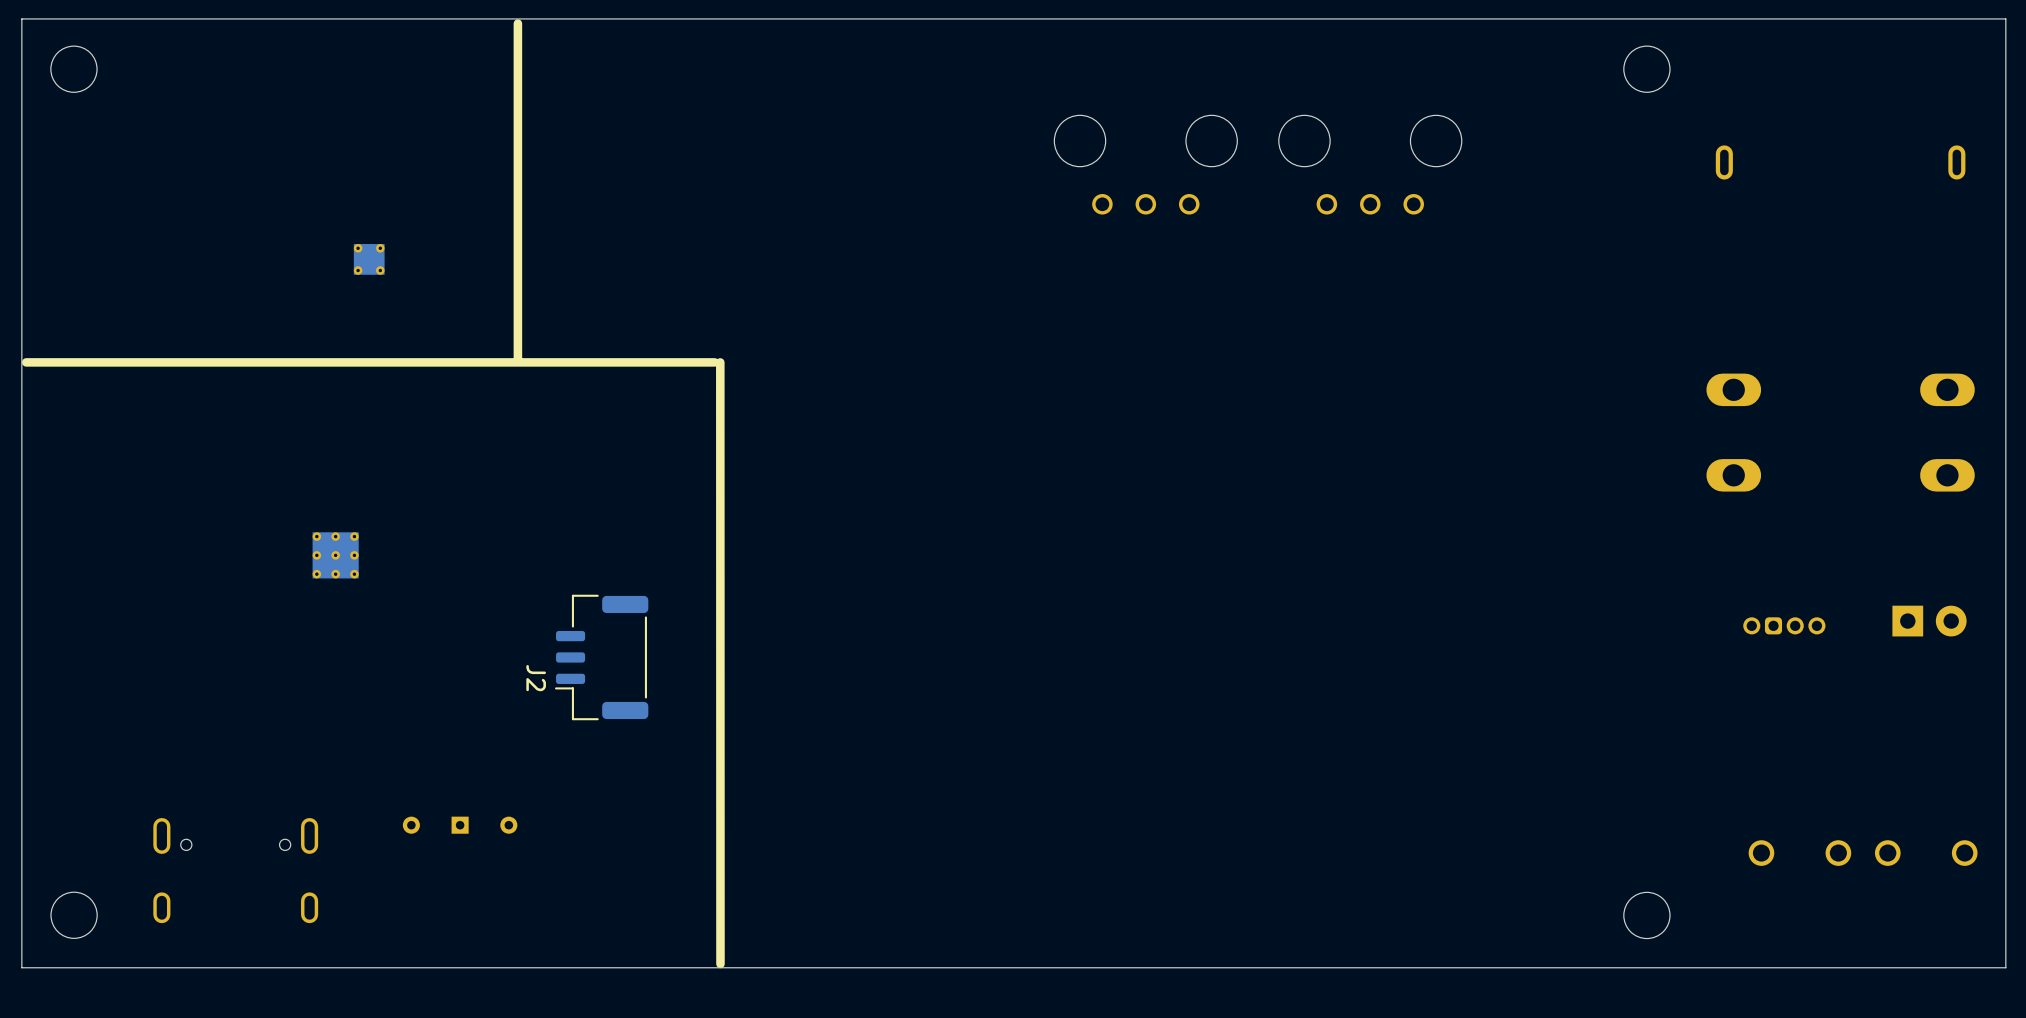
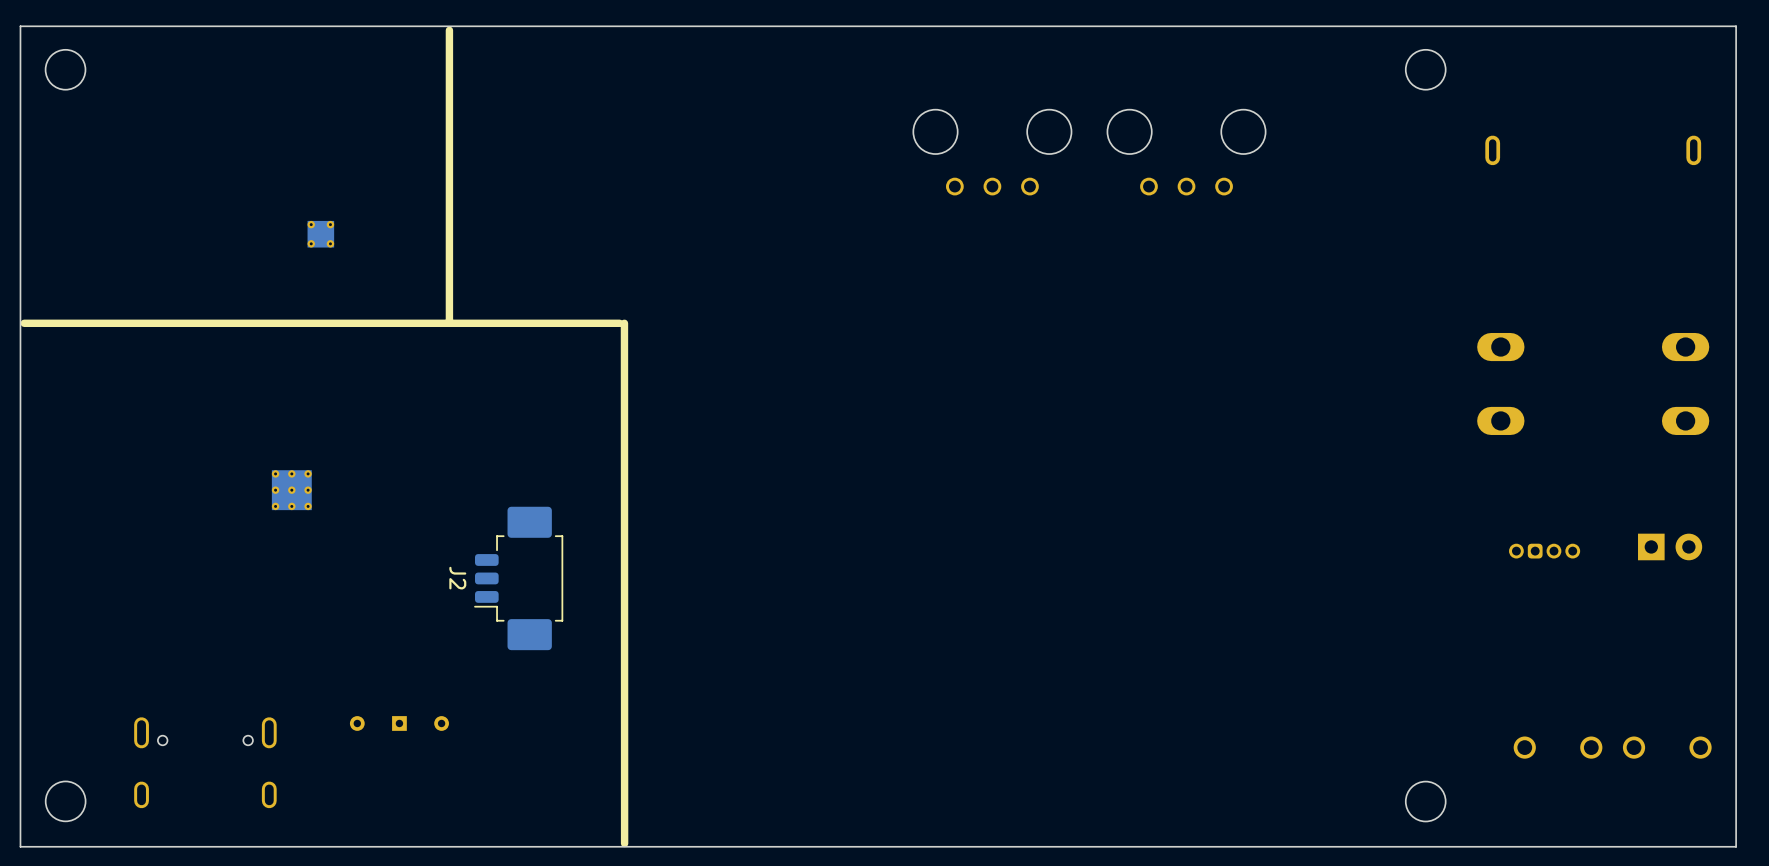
J2 footprint: [554, 594, 649, 721] -> [474, 506, 564, 651]

